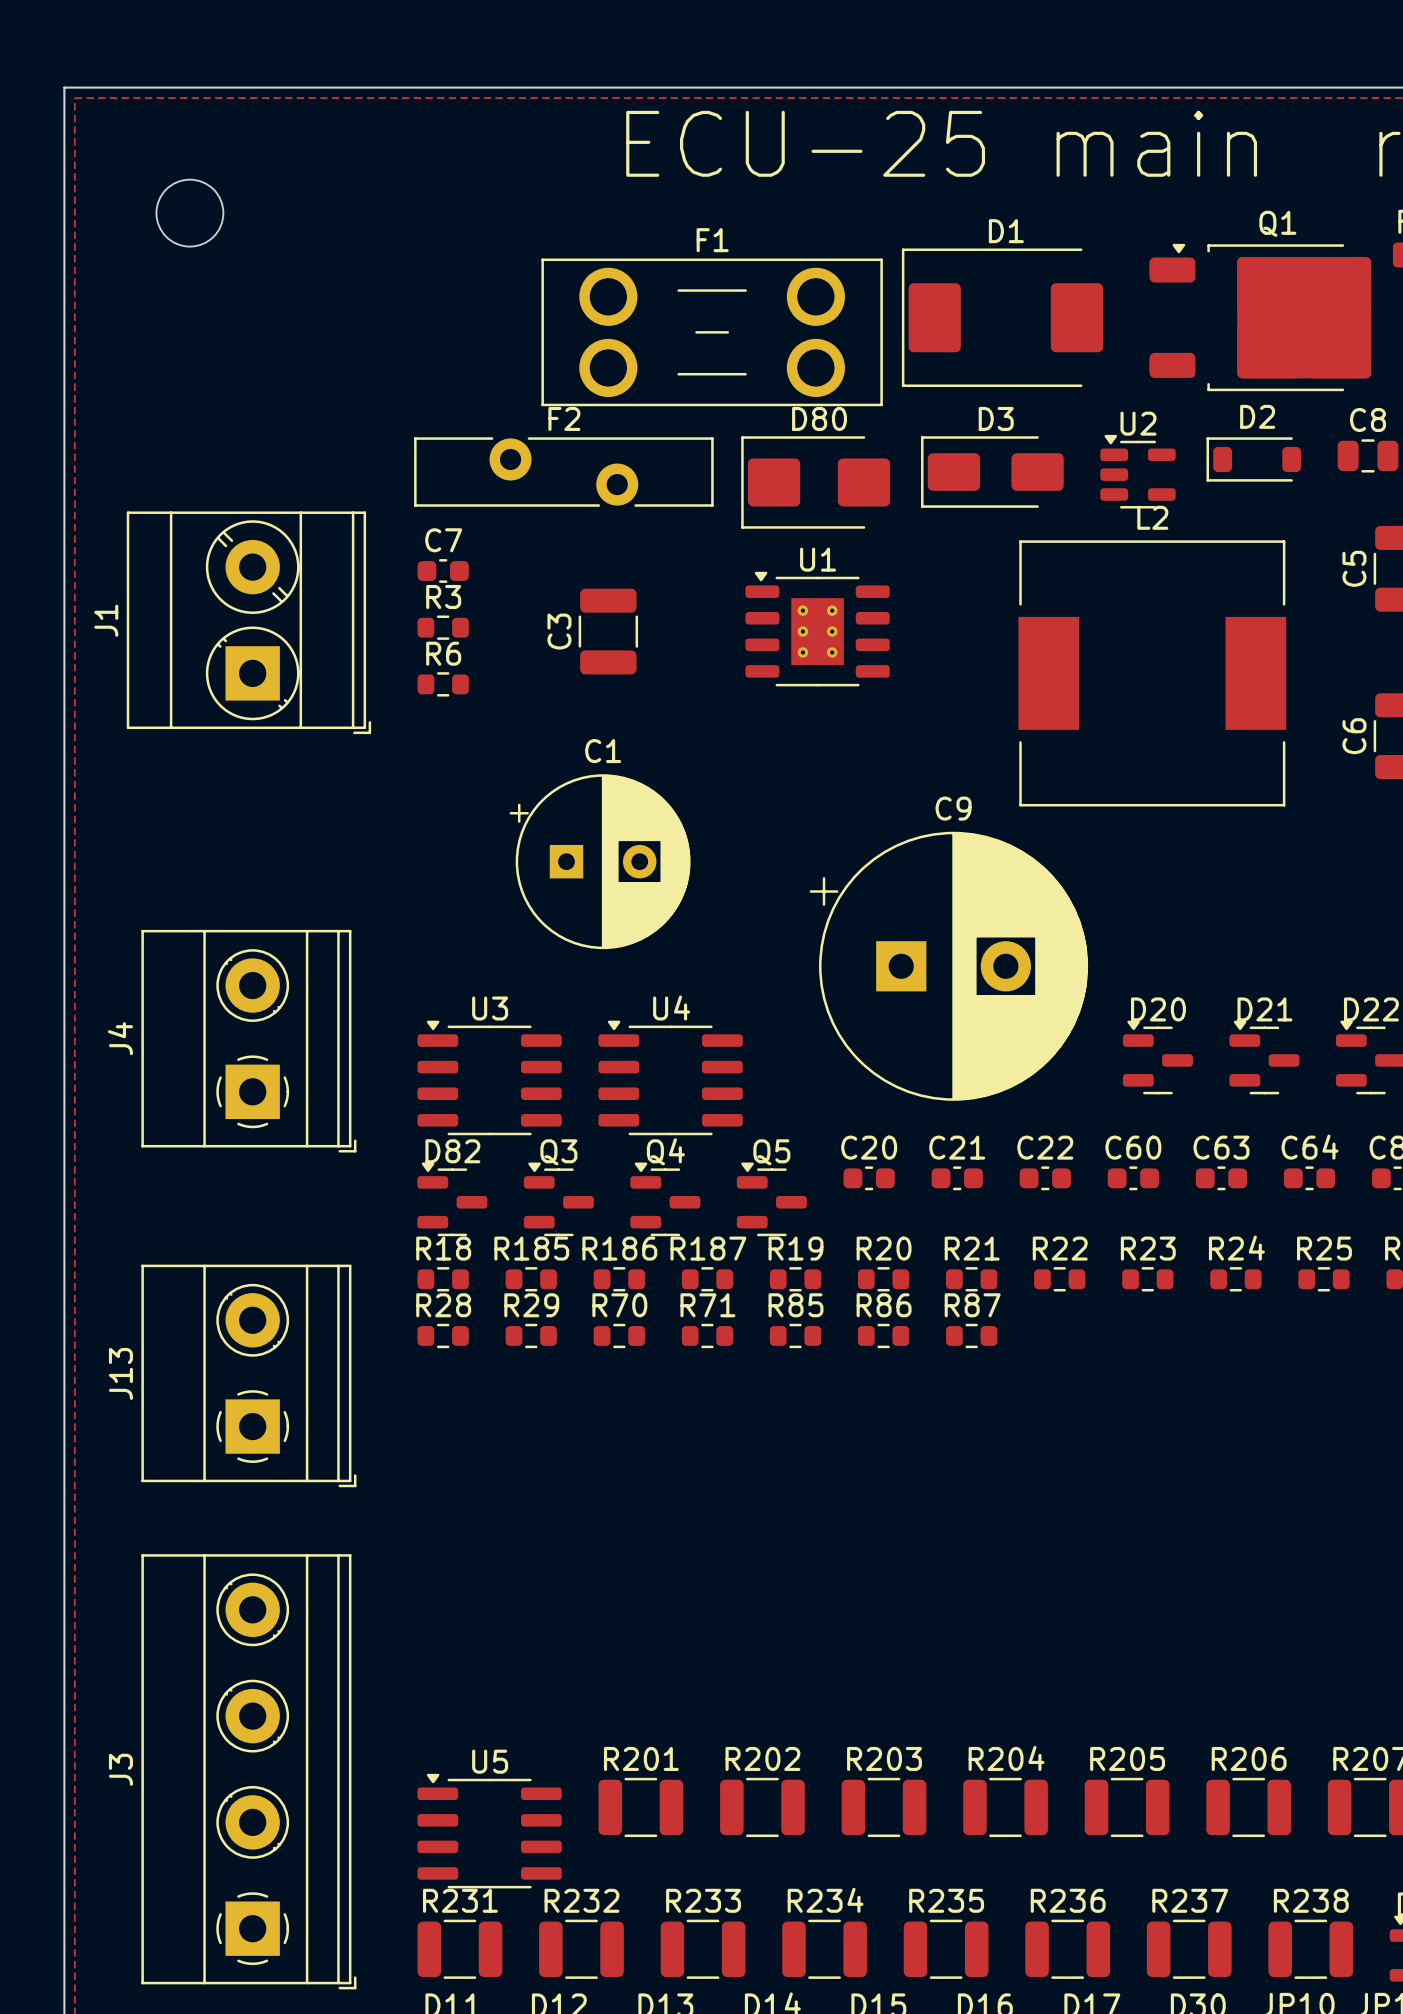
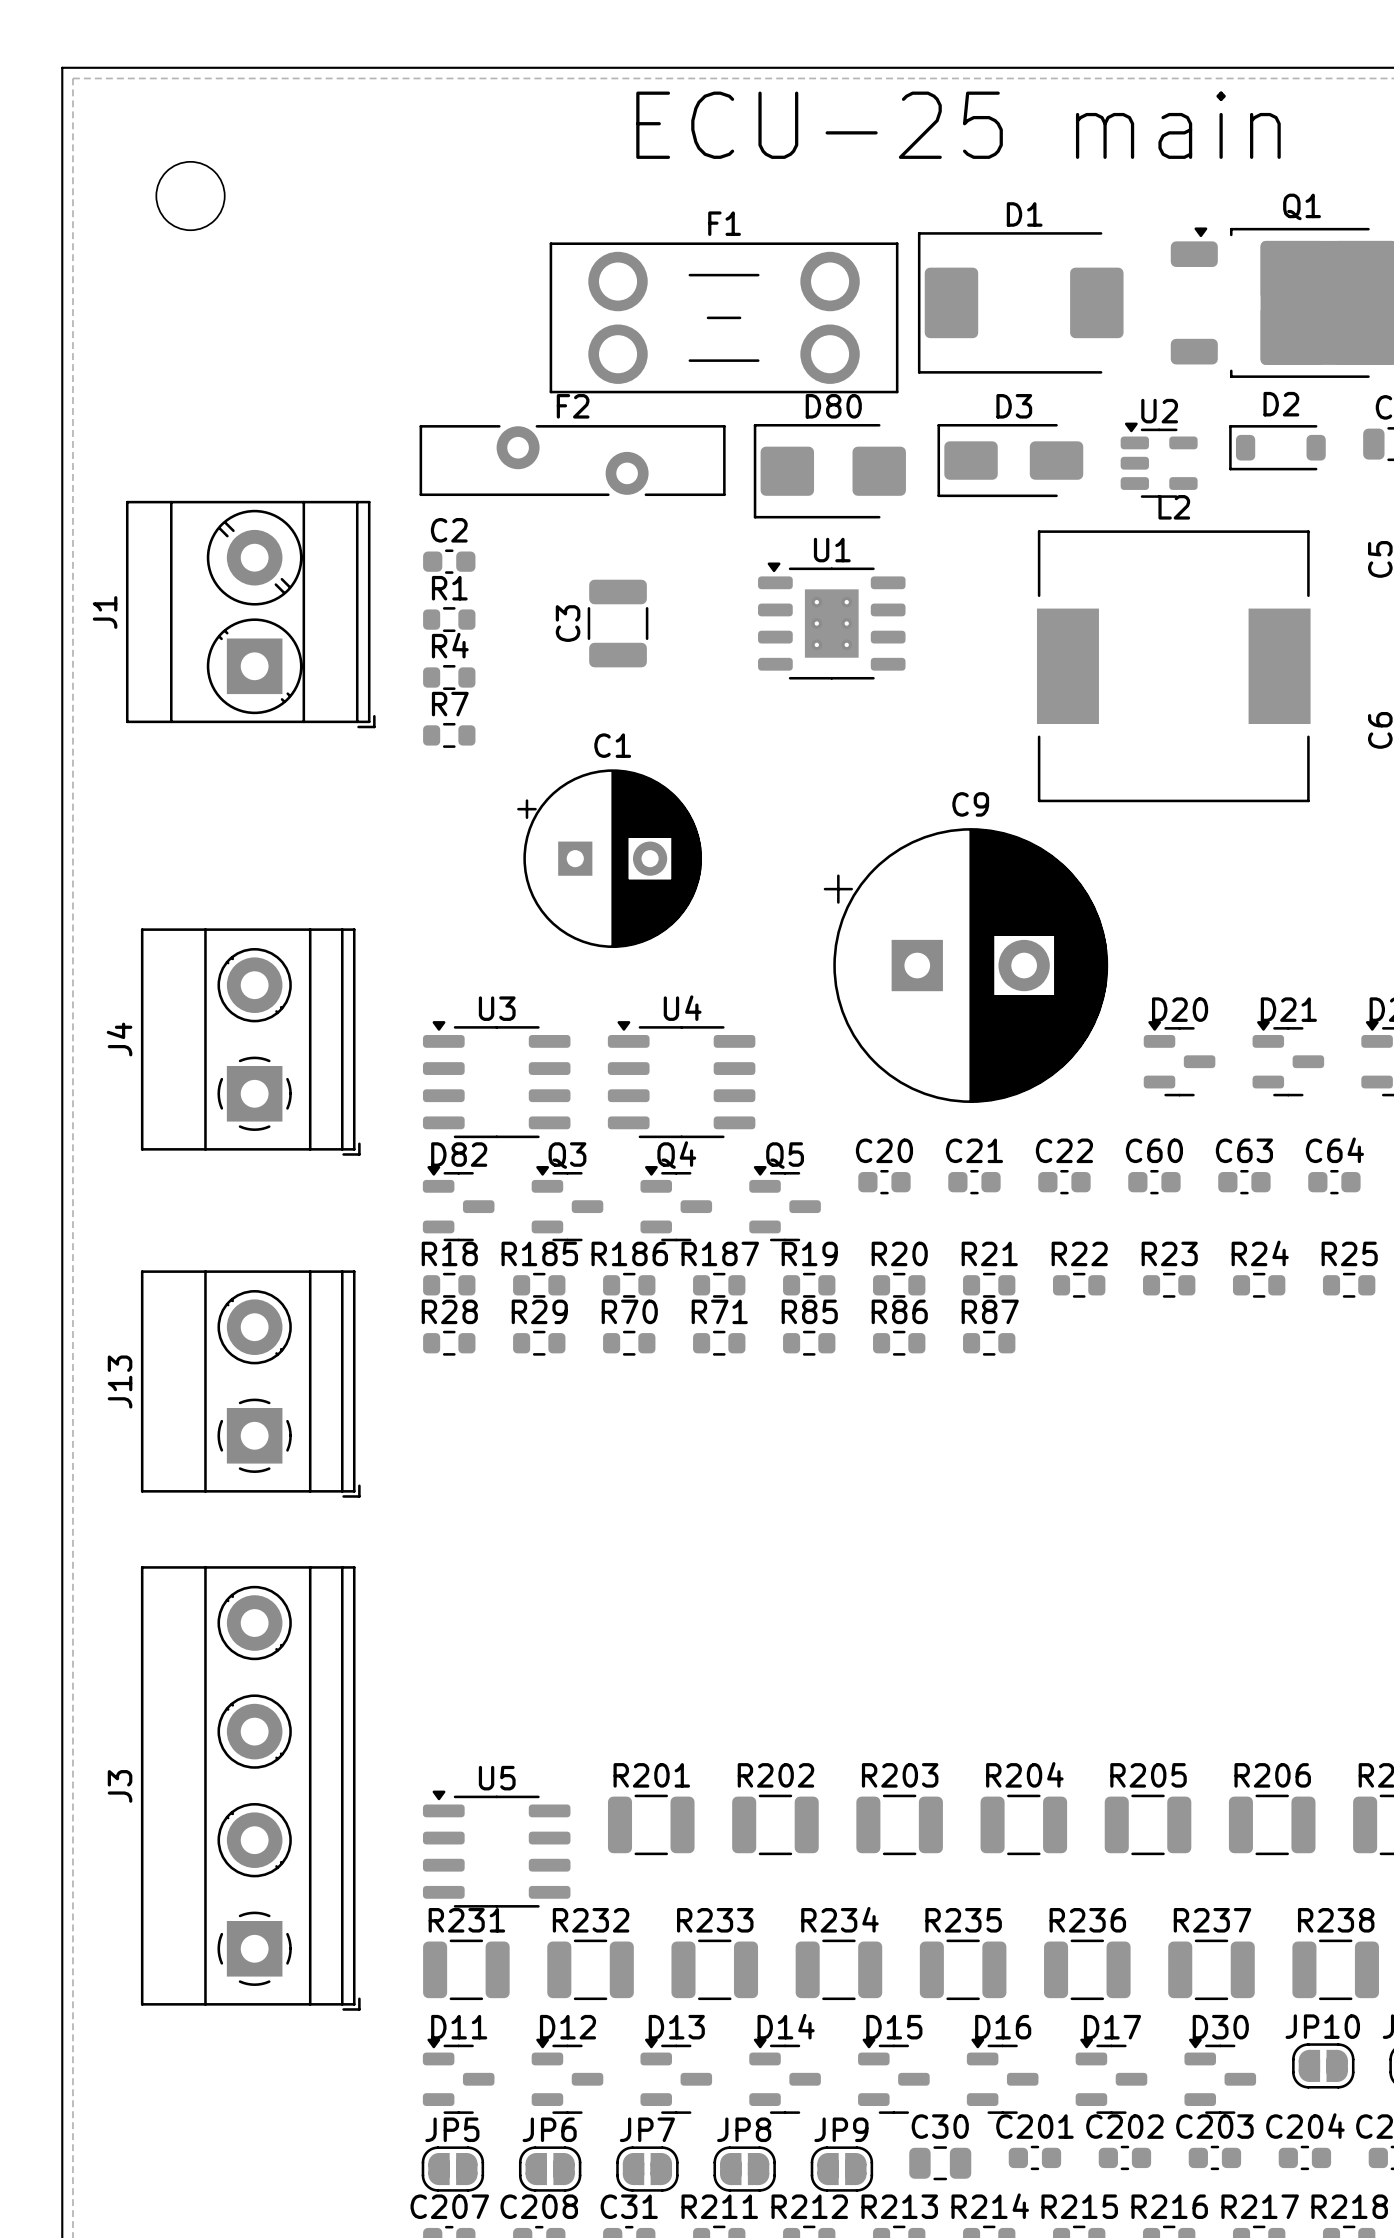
C7 name: C7 (443, 540) -> C2 (449, 530)
R3 name: R3 (443, 596) -> R1 (449, 588)
R6 name: R6 (443, 653) -> R4 (450, 645)
R7: none -> (449, 735)

